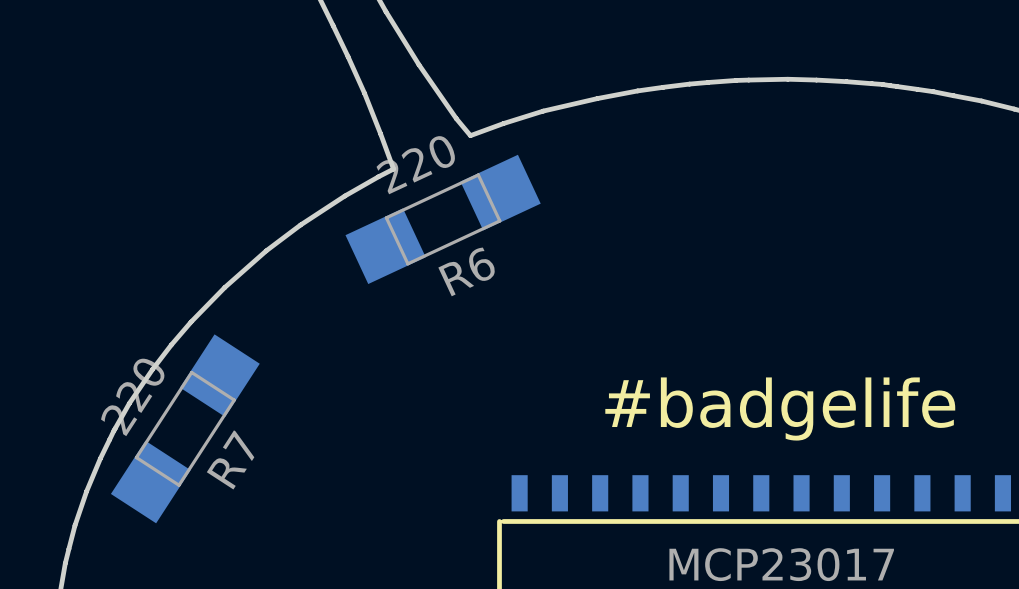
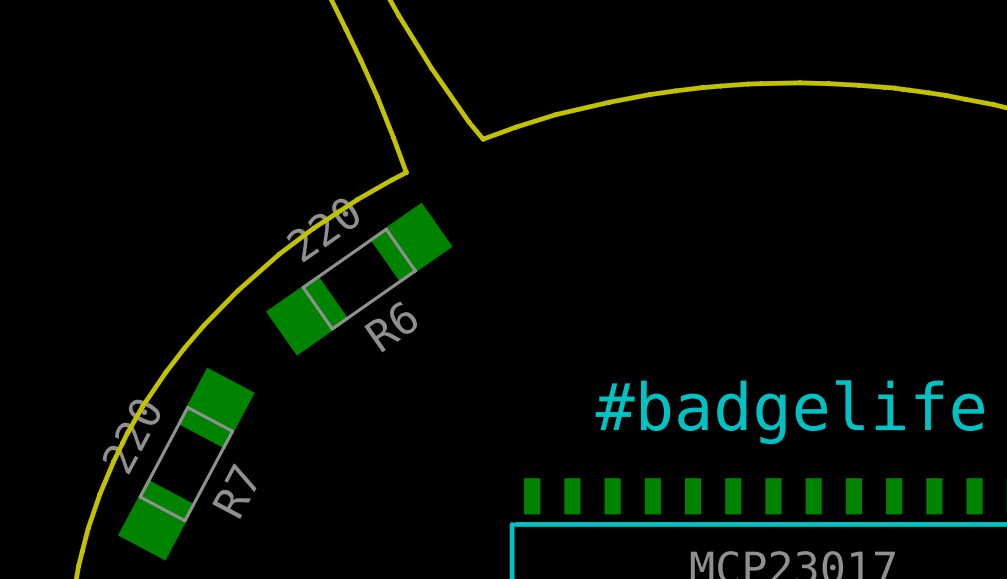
R6 rotation: 0° (443, 219) -> 10° counterclockwise (359, 279)
R7 rotation: 0° (185, 428) -> 5° counterclockwise (186, 464)

